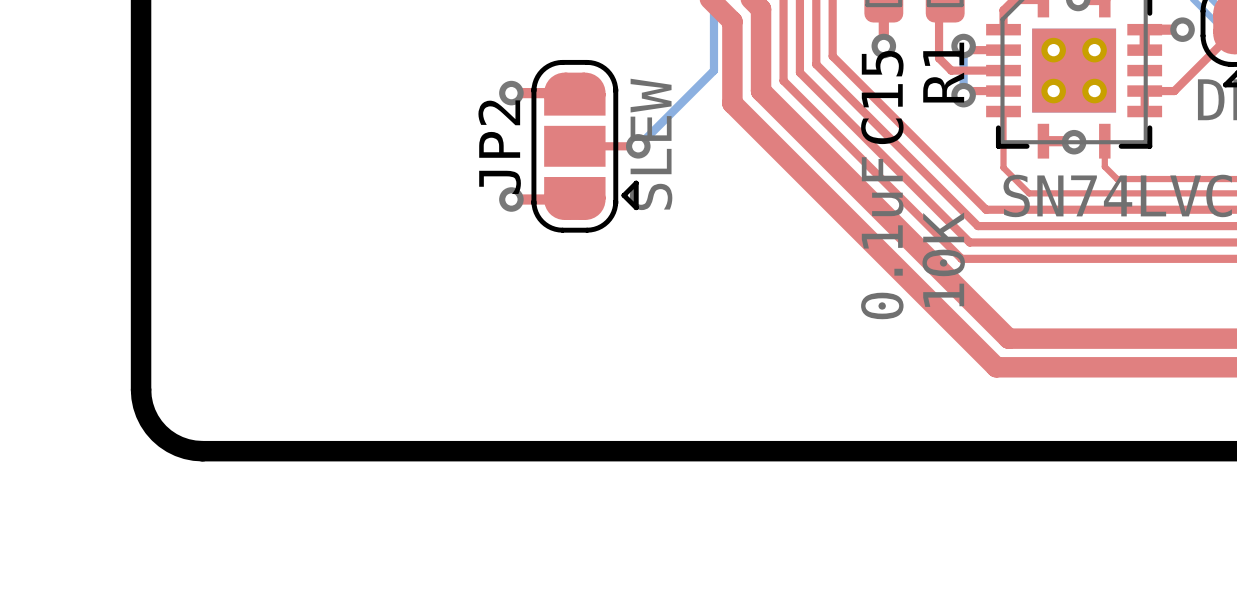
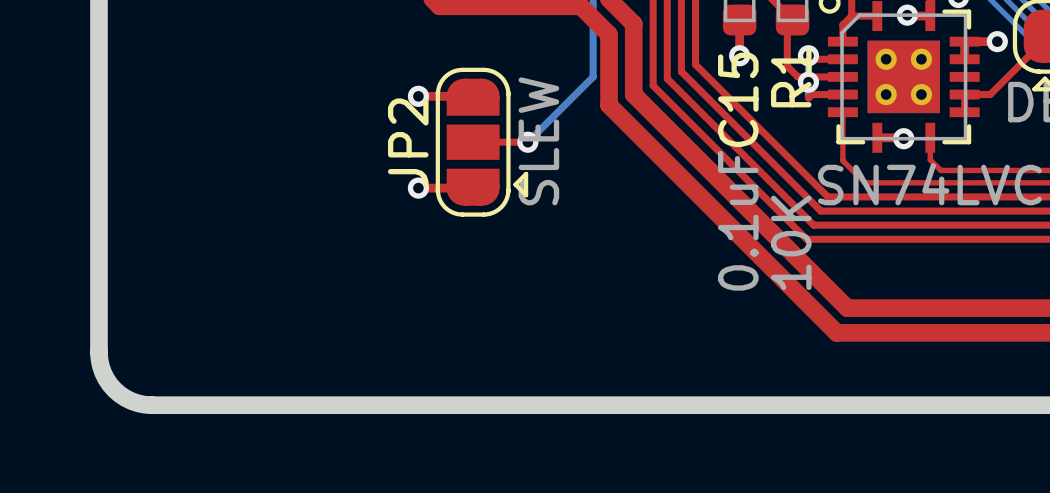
via position: (963, 95) -> (808, 82)

